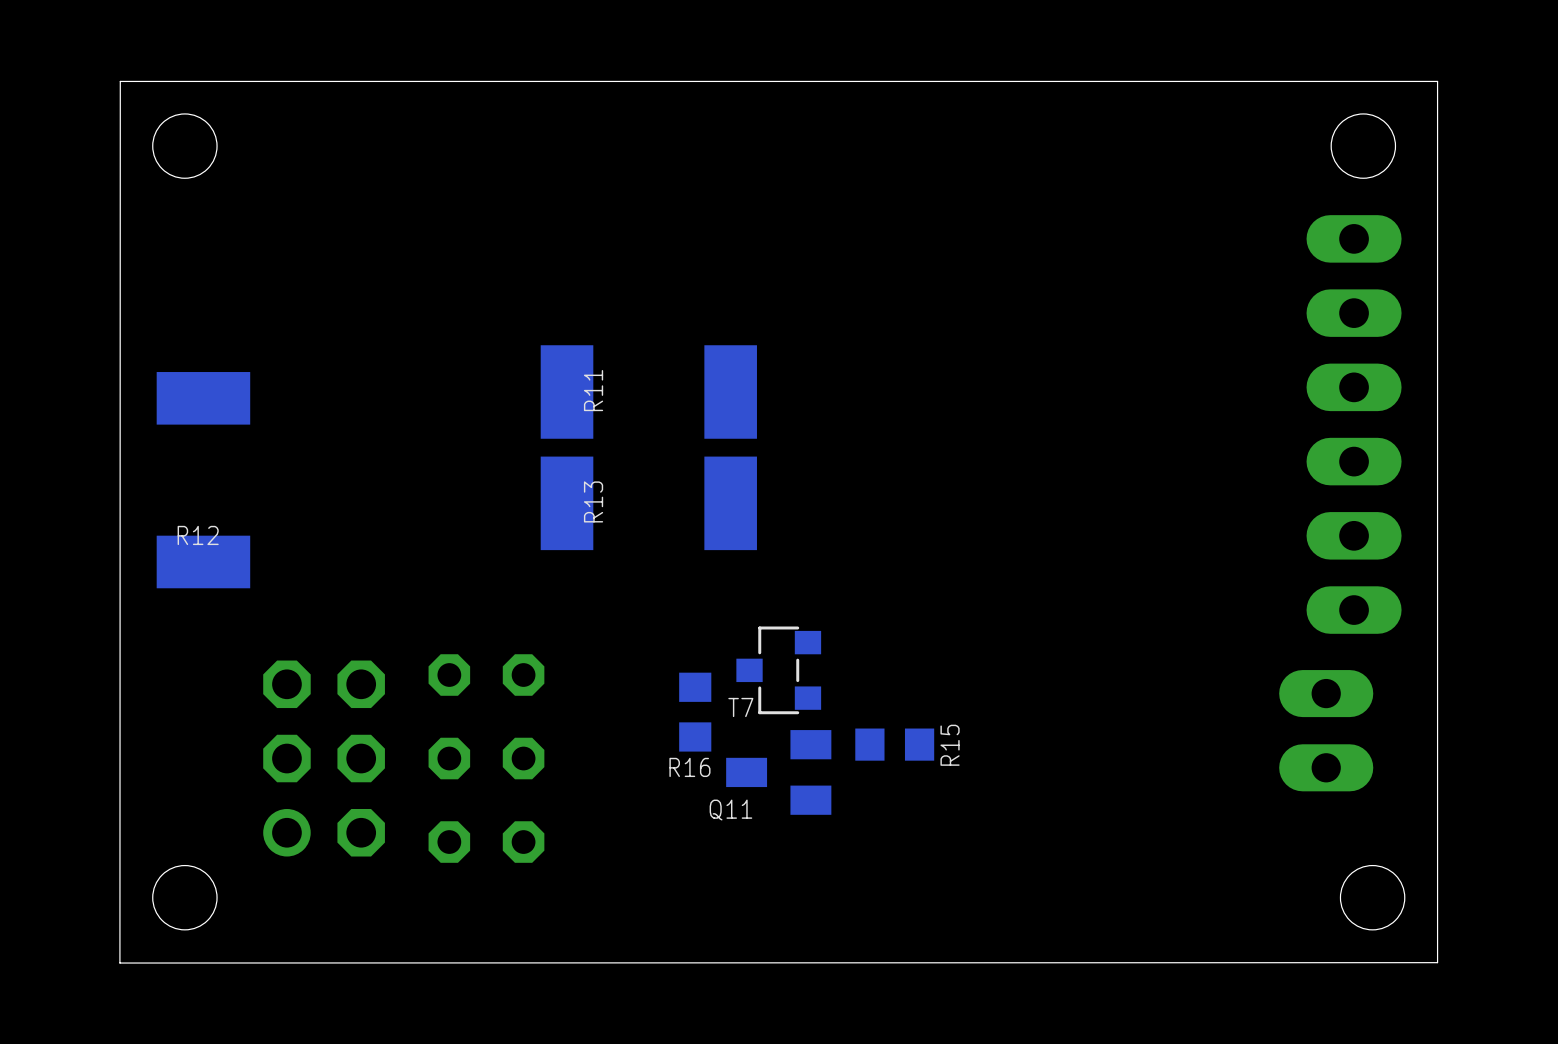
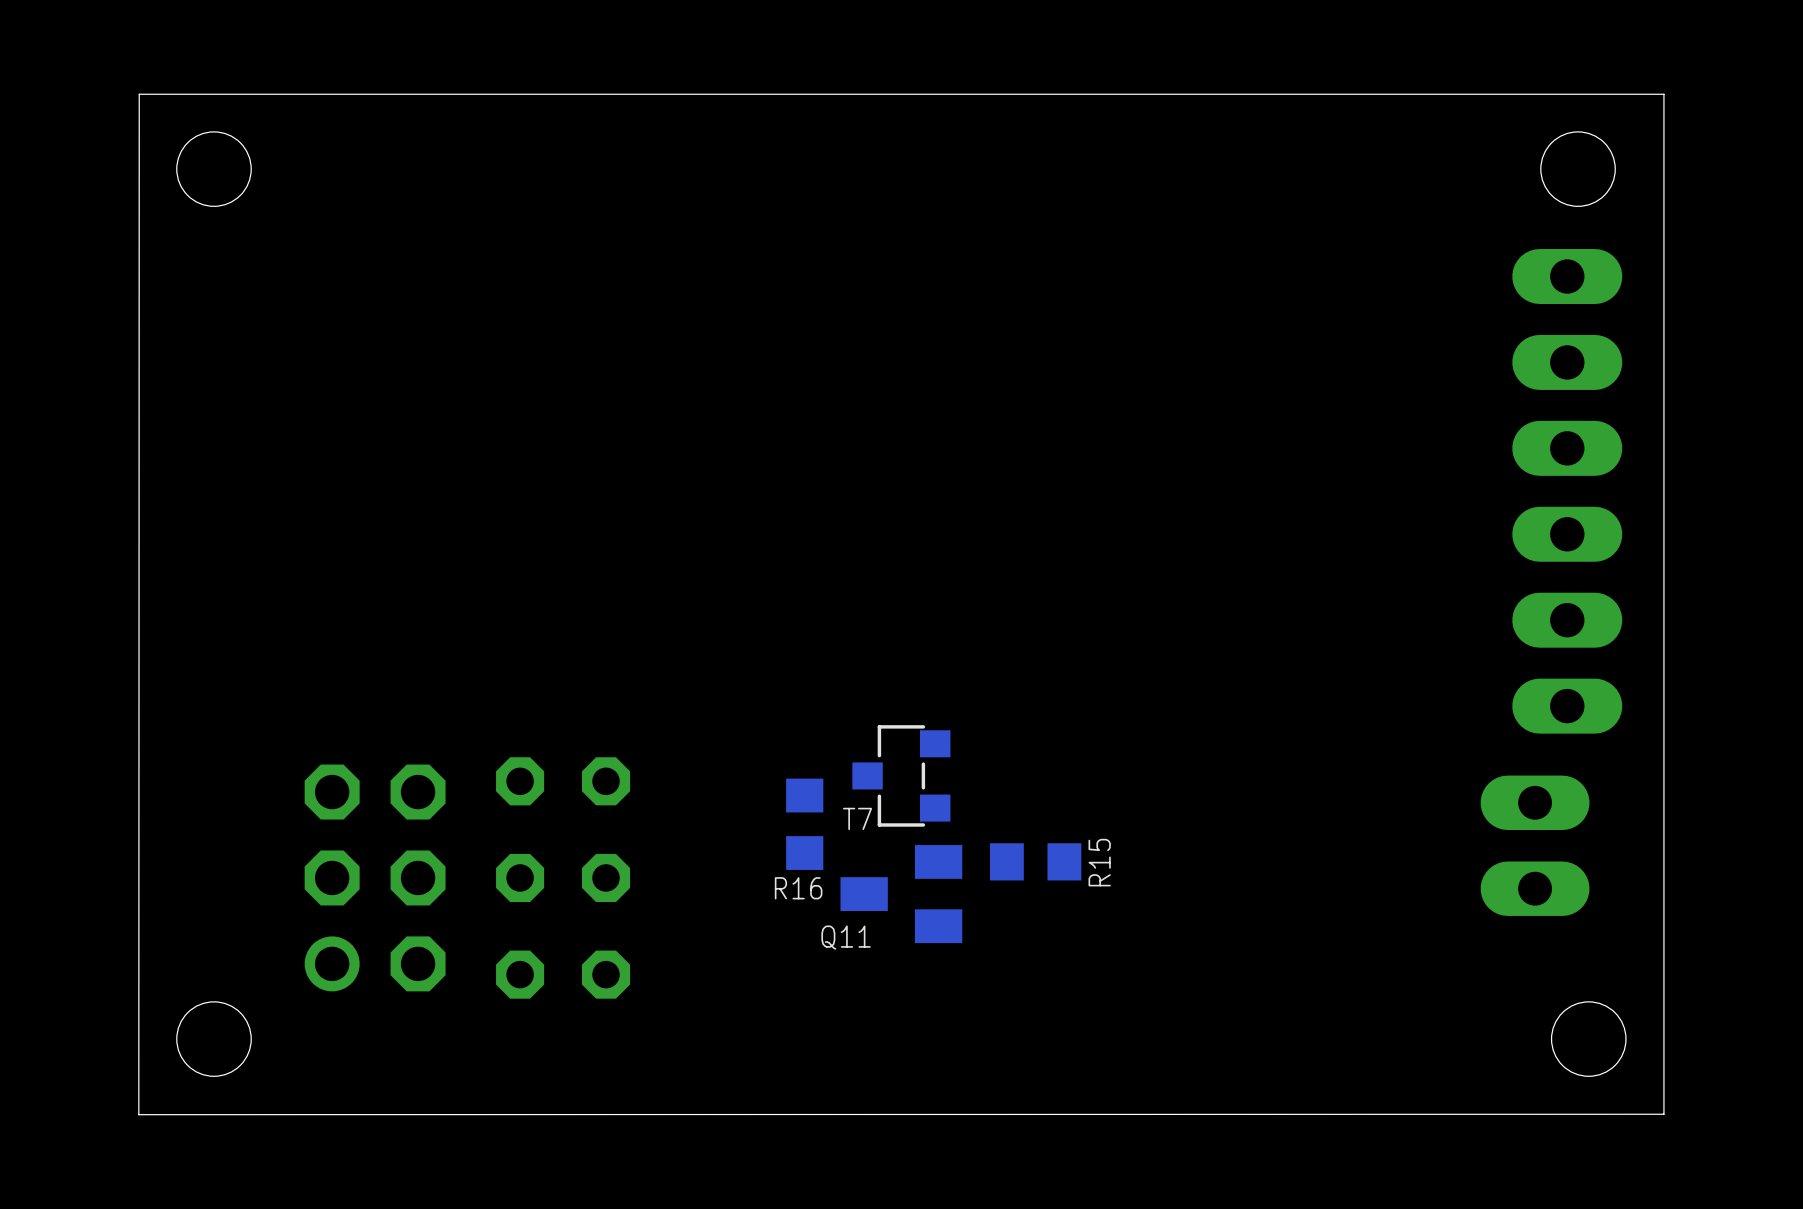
R11: (648, 391) -> none
R12: (203, 480) -> none
R13: (648, 503) -> none

